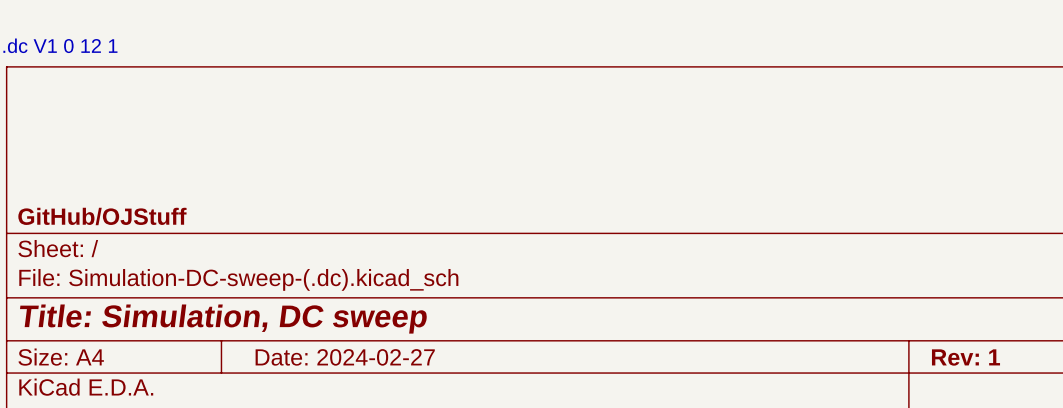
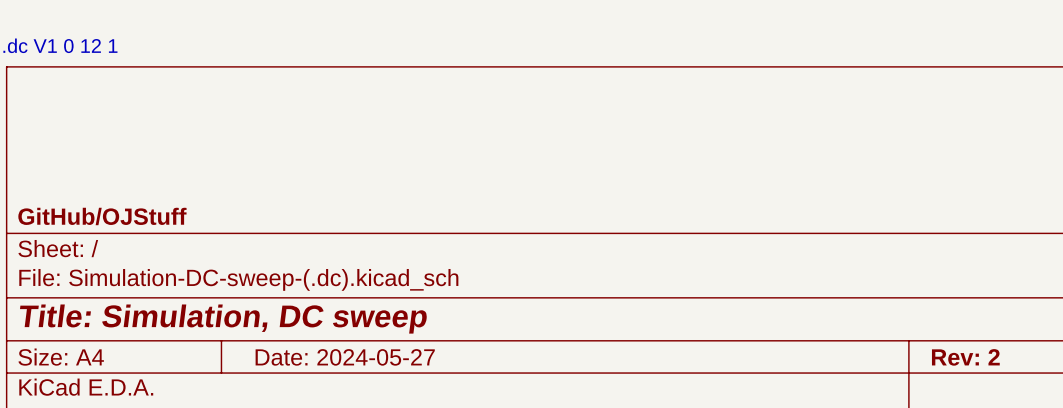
title block: Date: 2024-02-27 (345, 357) -> Date: 2024-05-27 (345, 357)
title block: Rev: 1 (966, 357) -> Rev: 2 (965, 357)

